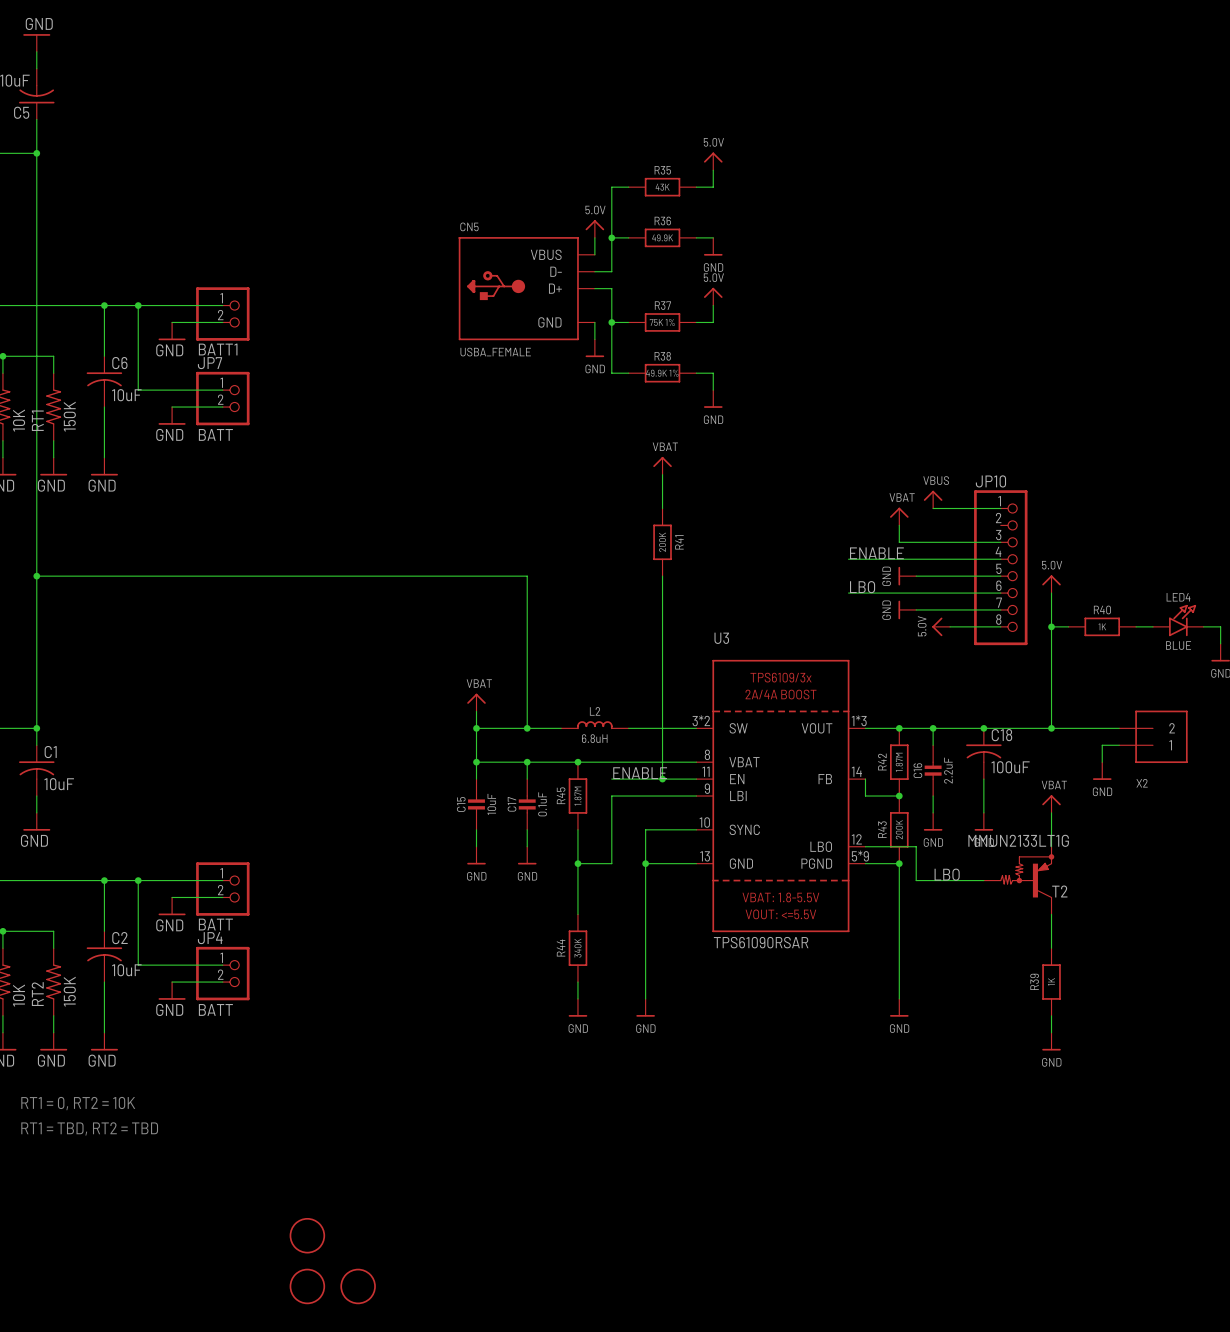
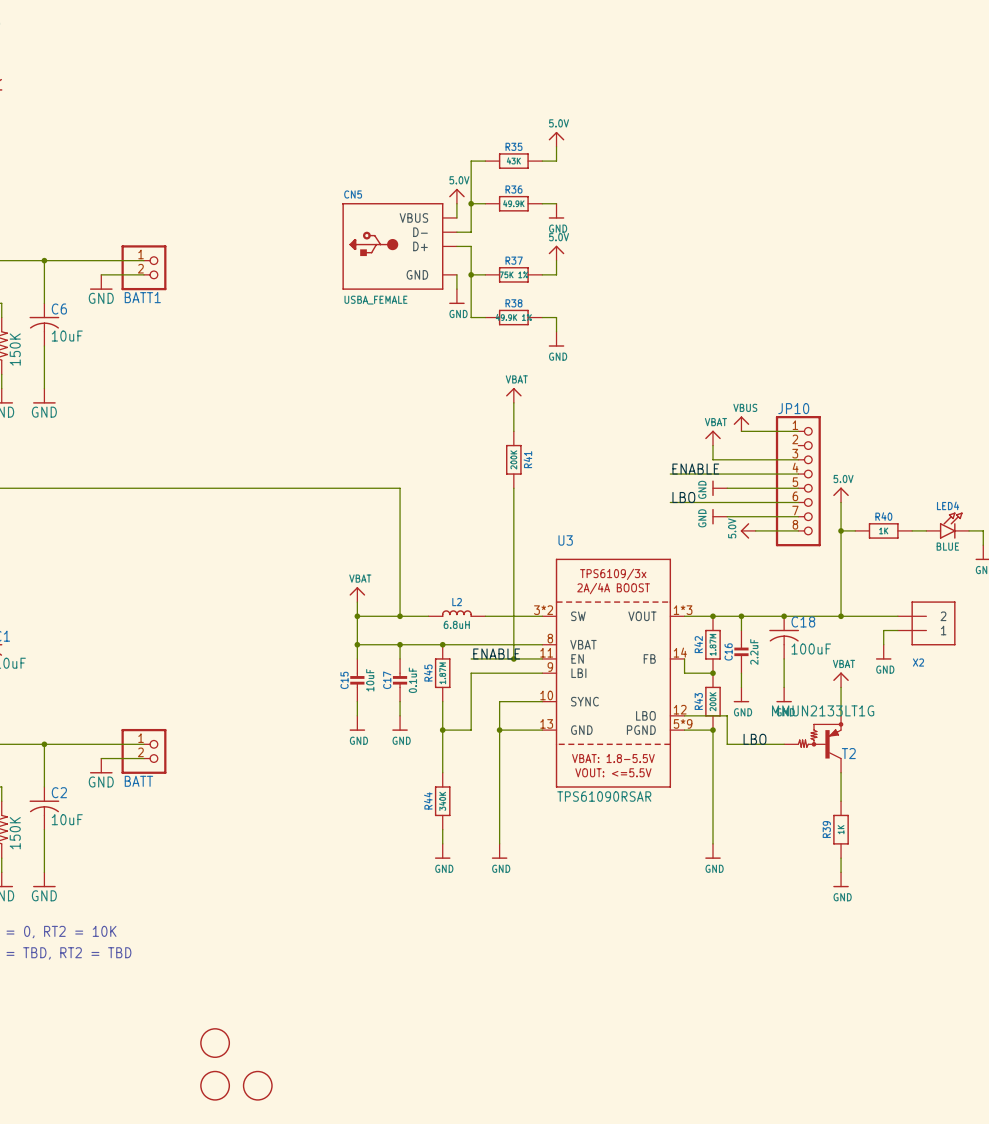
wire: (138, 305) (138, 390) (222, 390) -> none
junction: (138, 305) -> none
JP7: BATT (222, 398) -> none
wire: (172, 407) (222, 407) -> none
power symbol: GND (172, 415) -> none
wire: (138, 880) (138, 965) (222, 965) -> none
junction: (138, 880) -> none
JP4: BATT (222, 973) -> none
wire: (172, 982) (222, 982) -> none
power symbol: GND (172, 990) -> none

